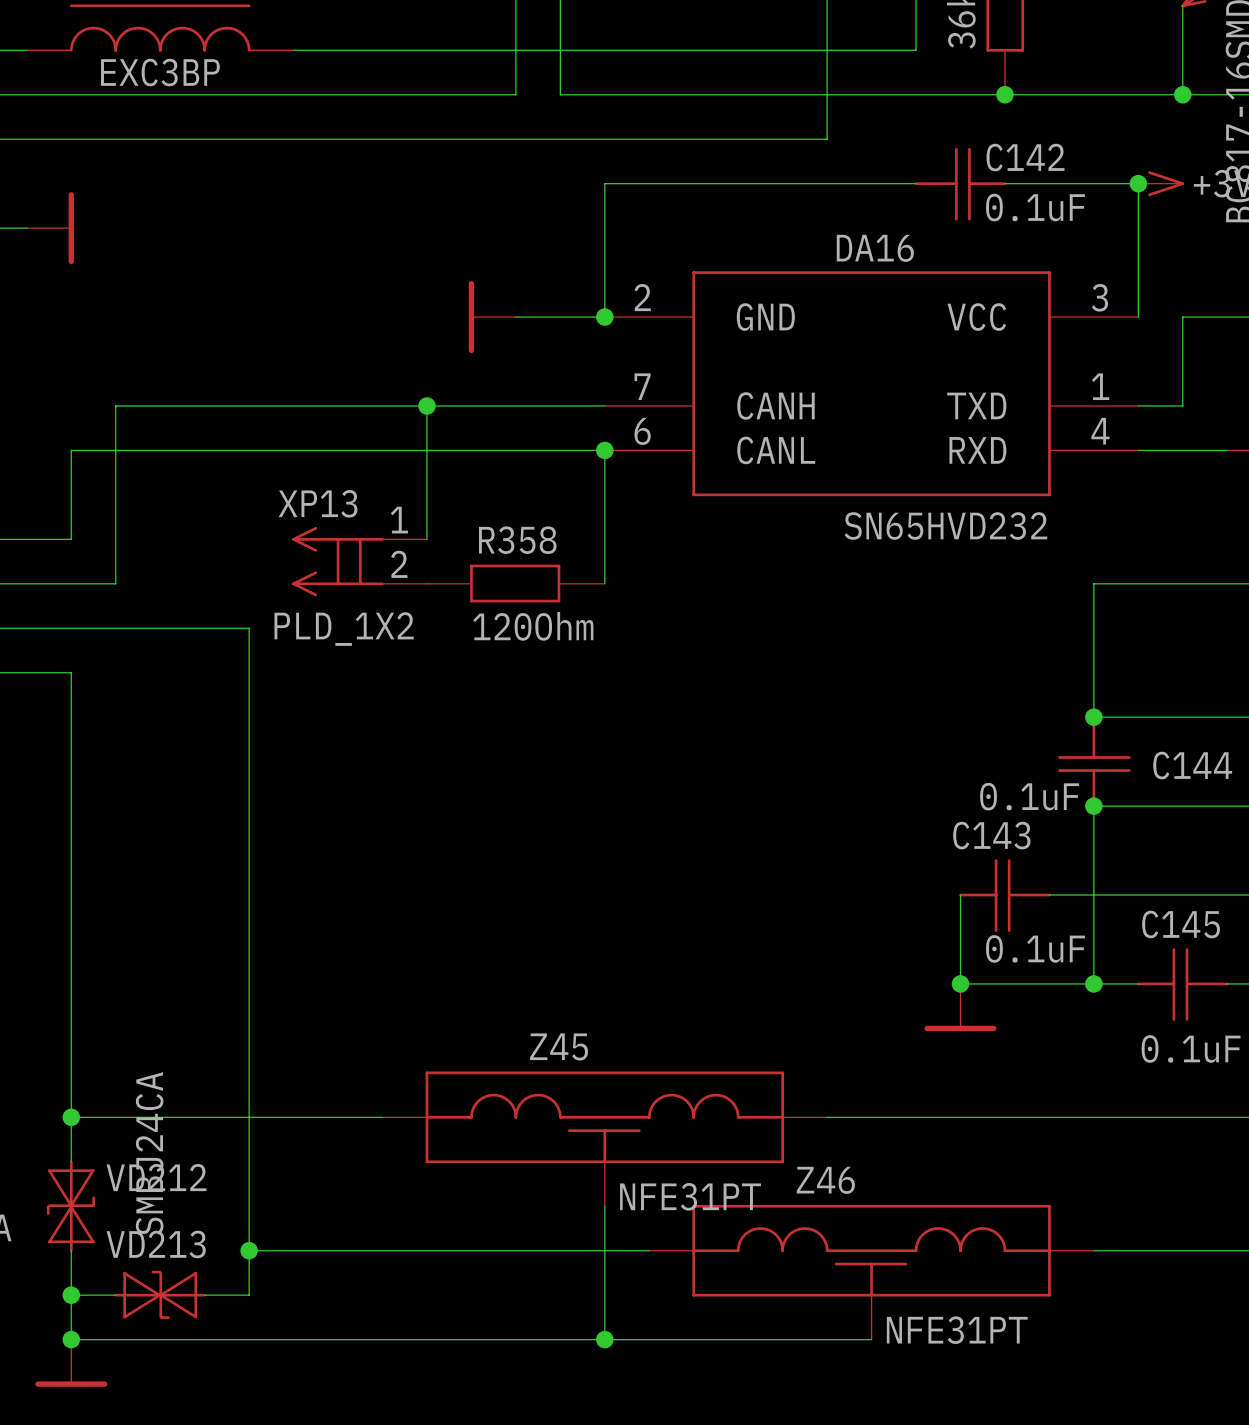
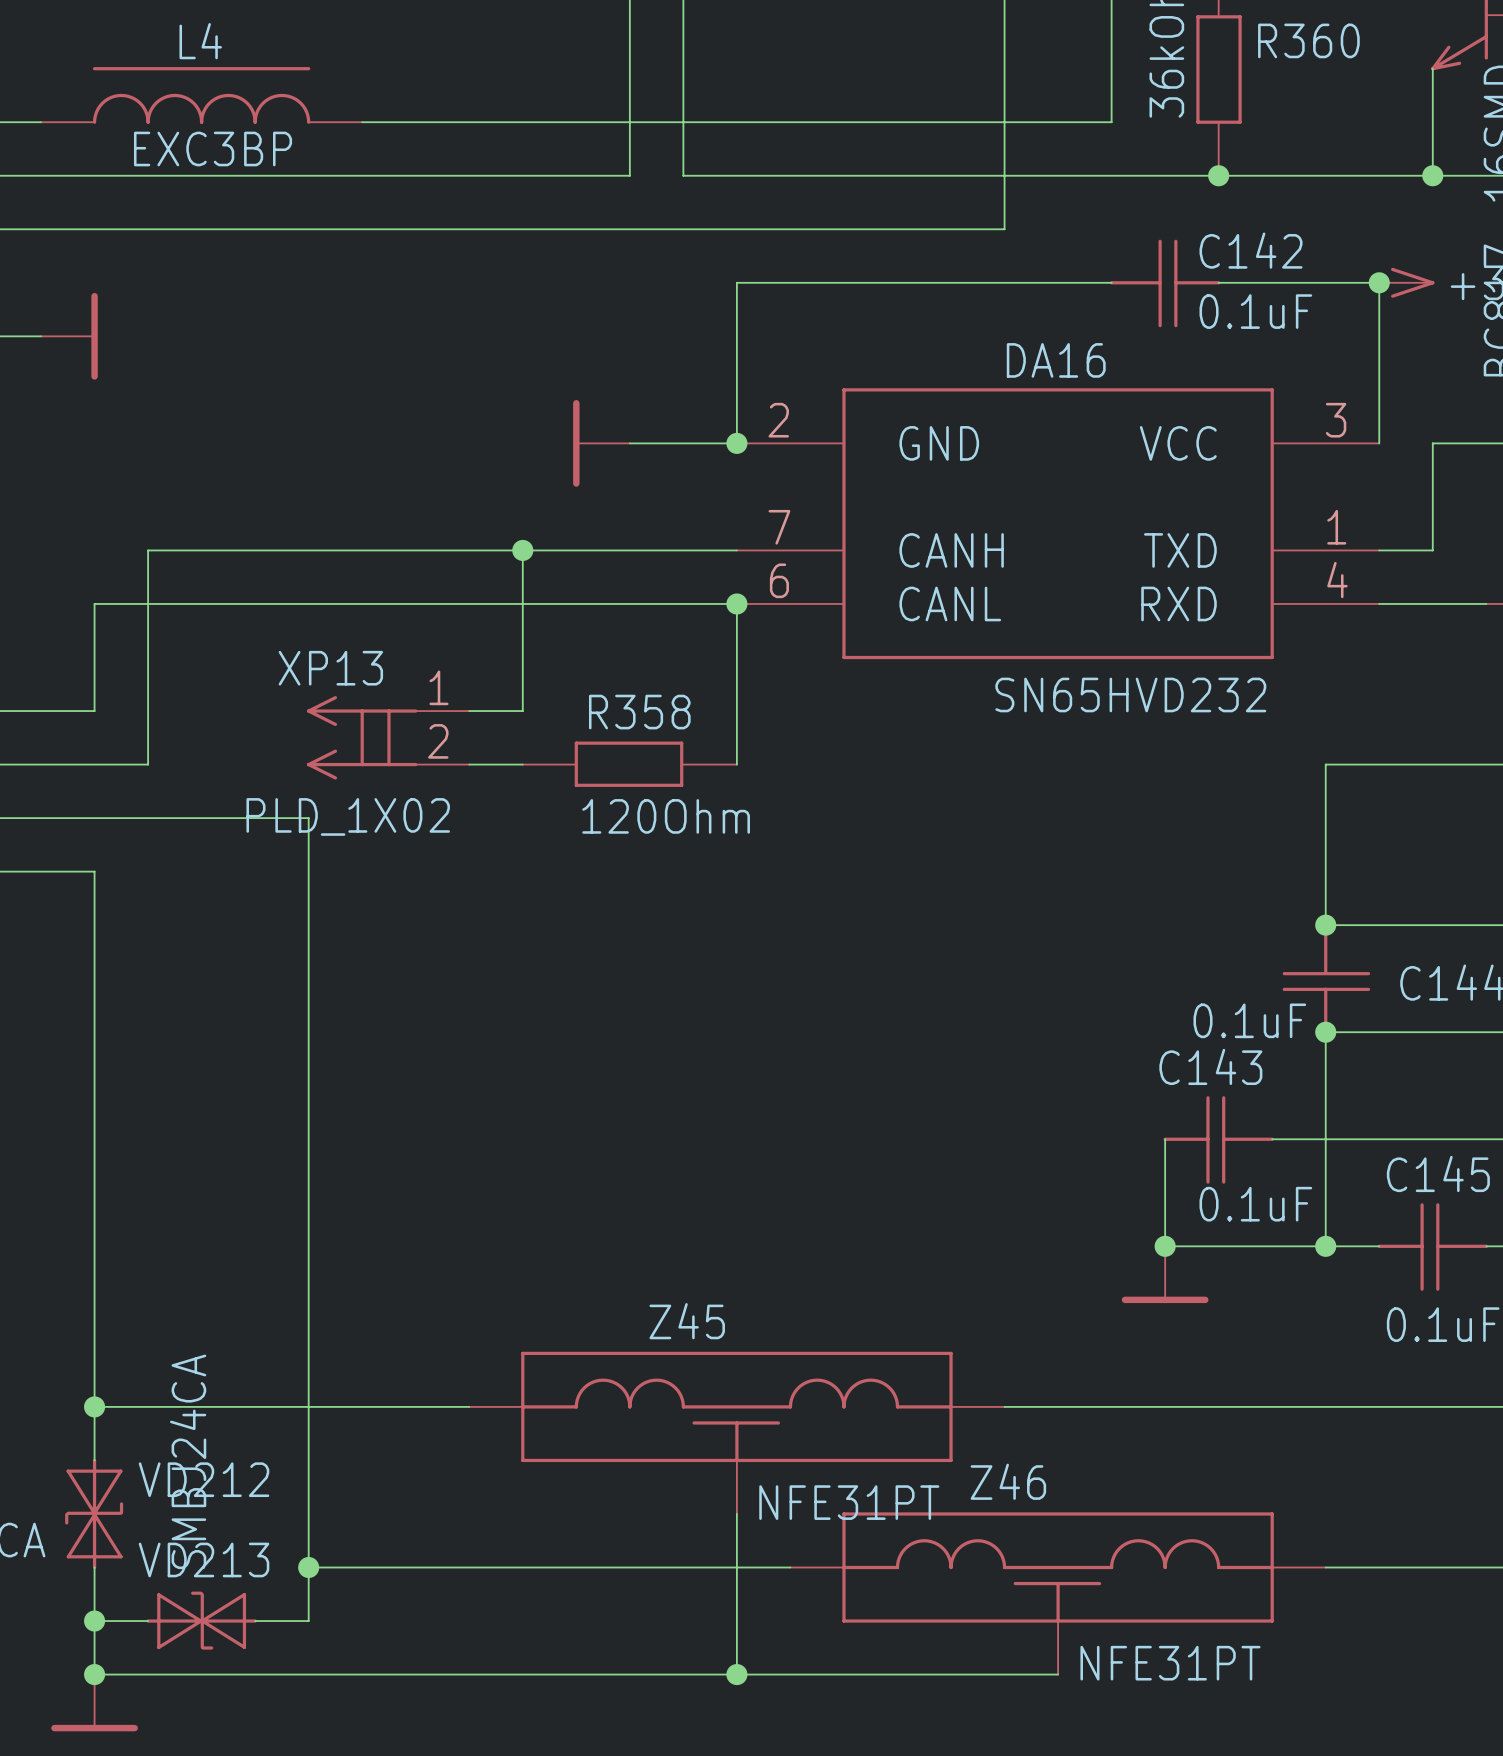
XP13 position: (359, 561) -> (388, 737)
XP13 value: PLD_1X2 (344, 629) -> PLD_1X02 (348, 816)

